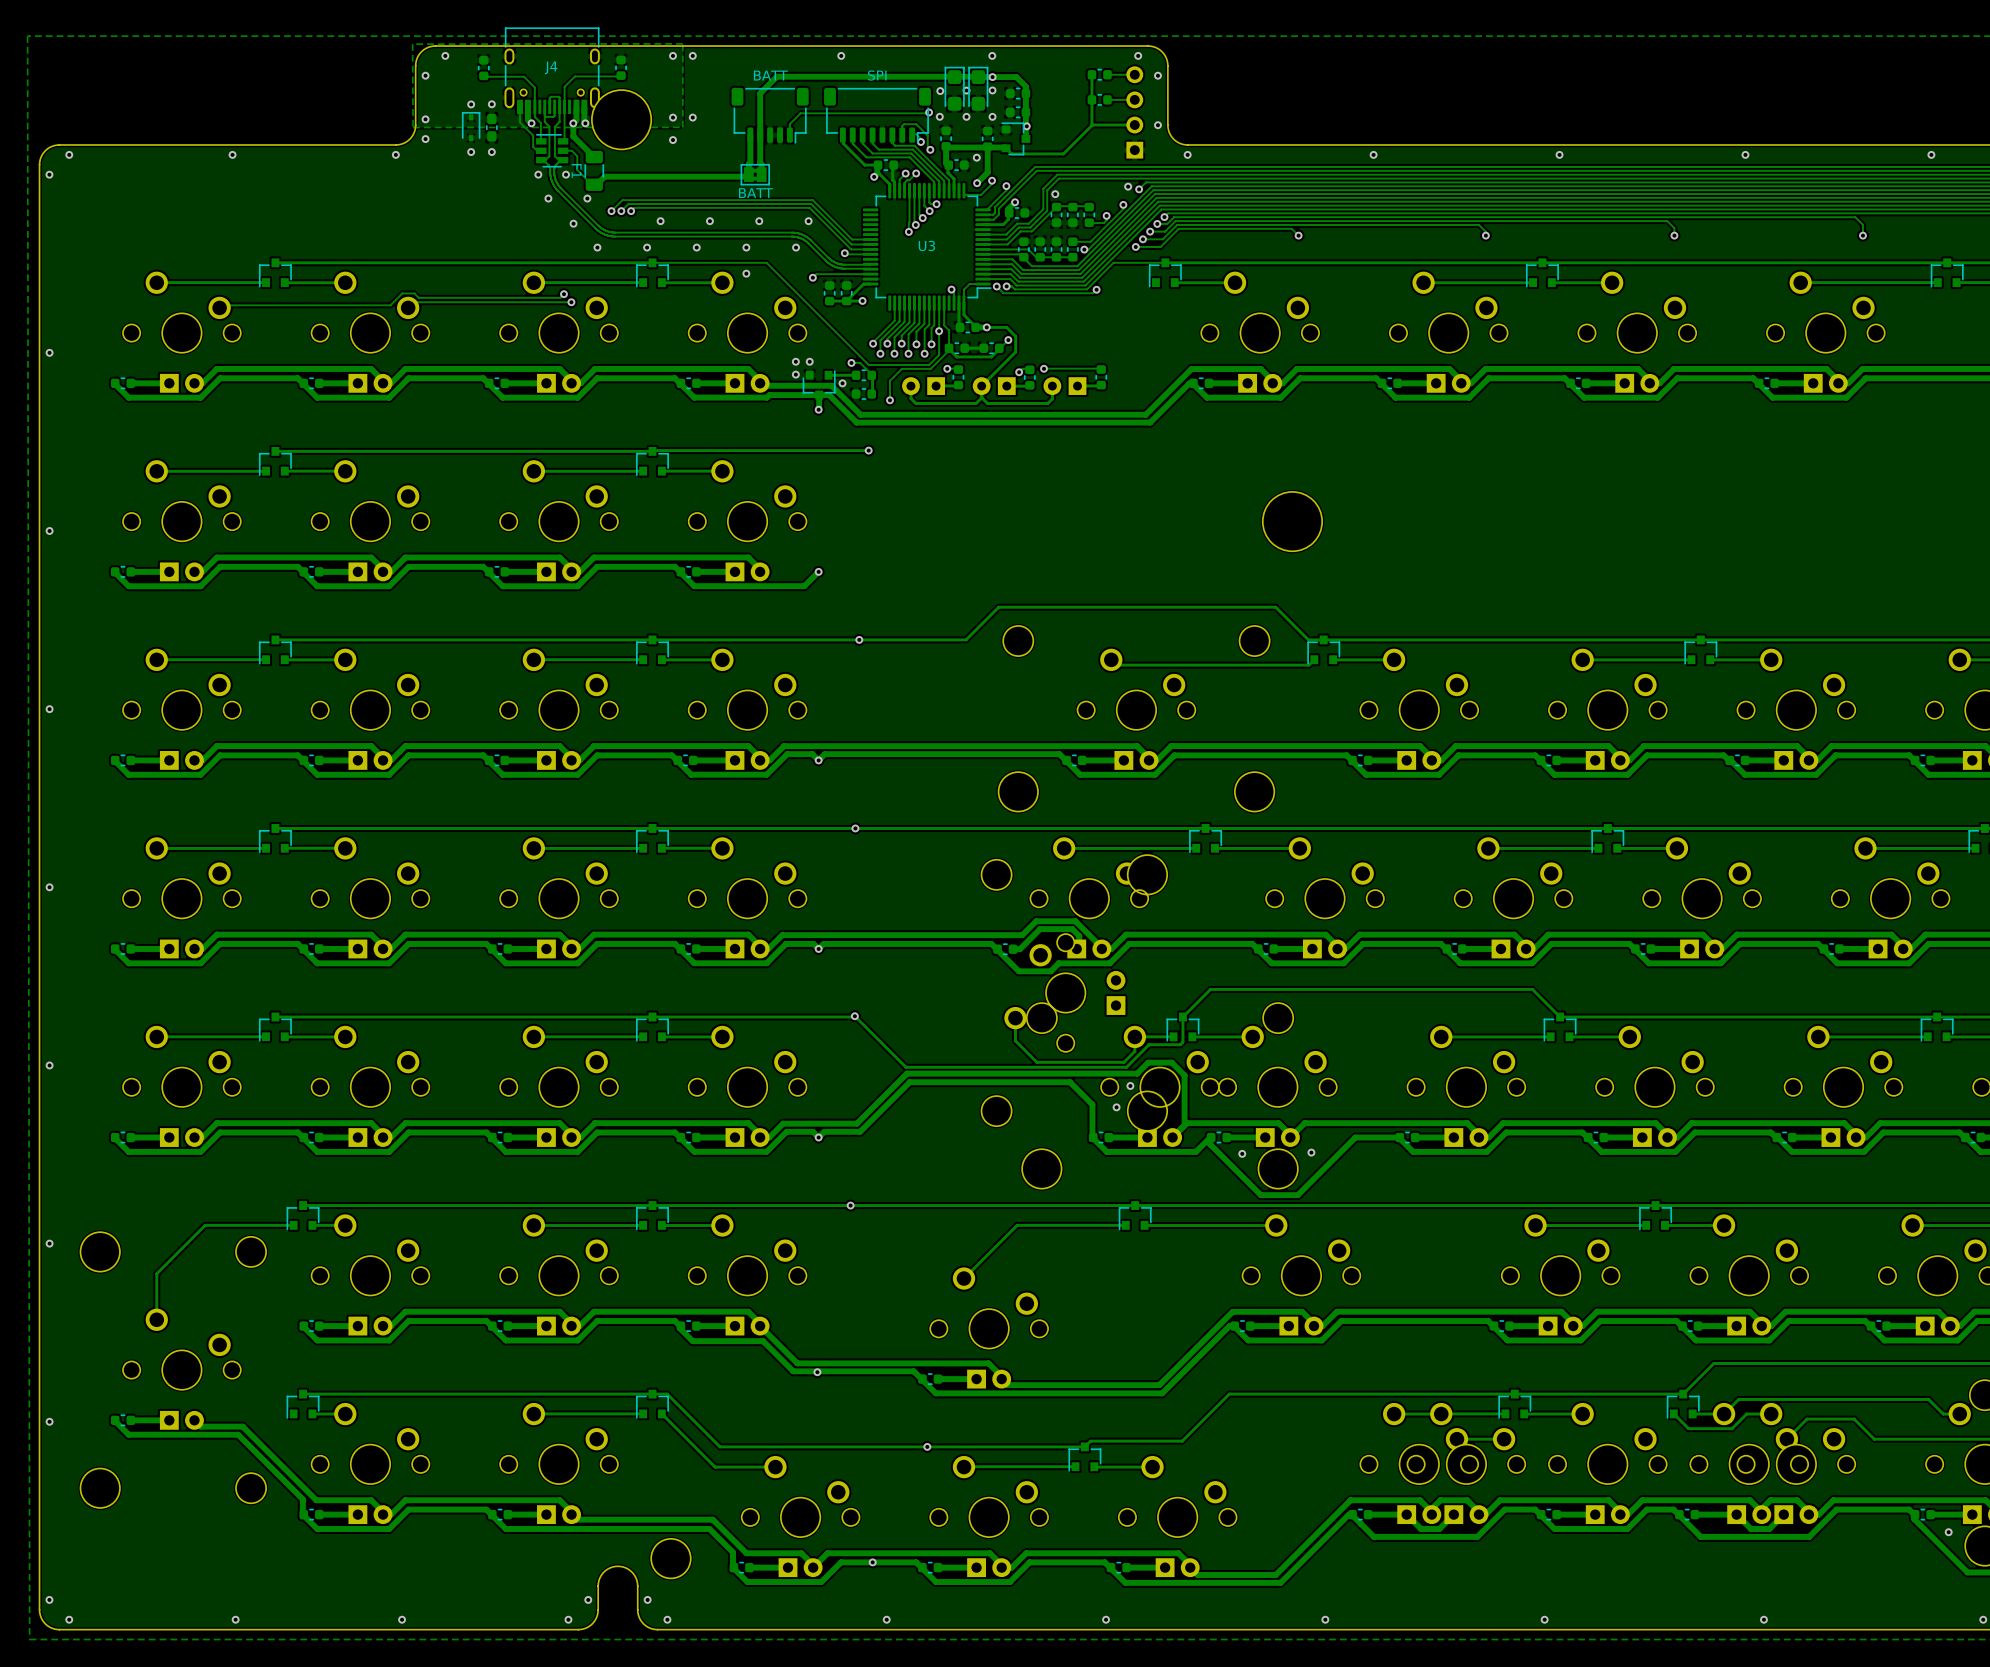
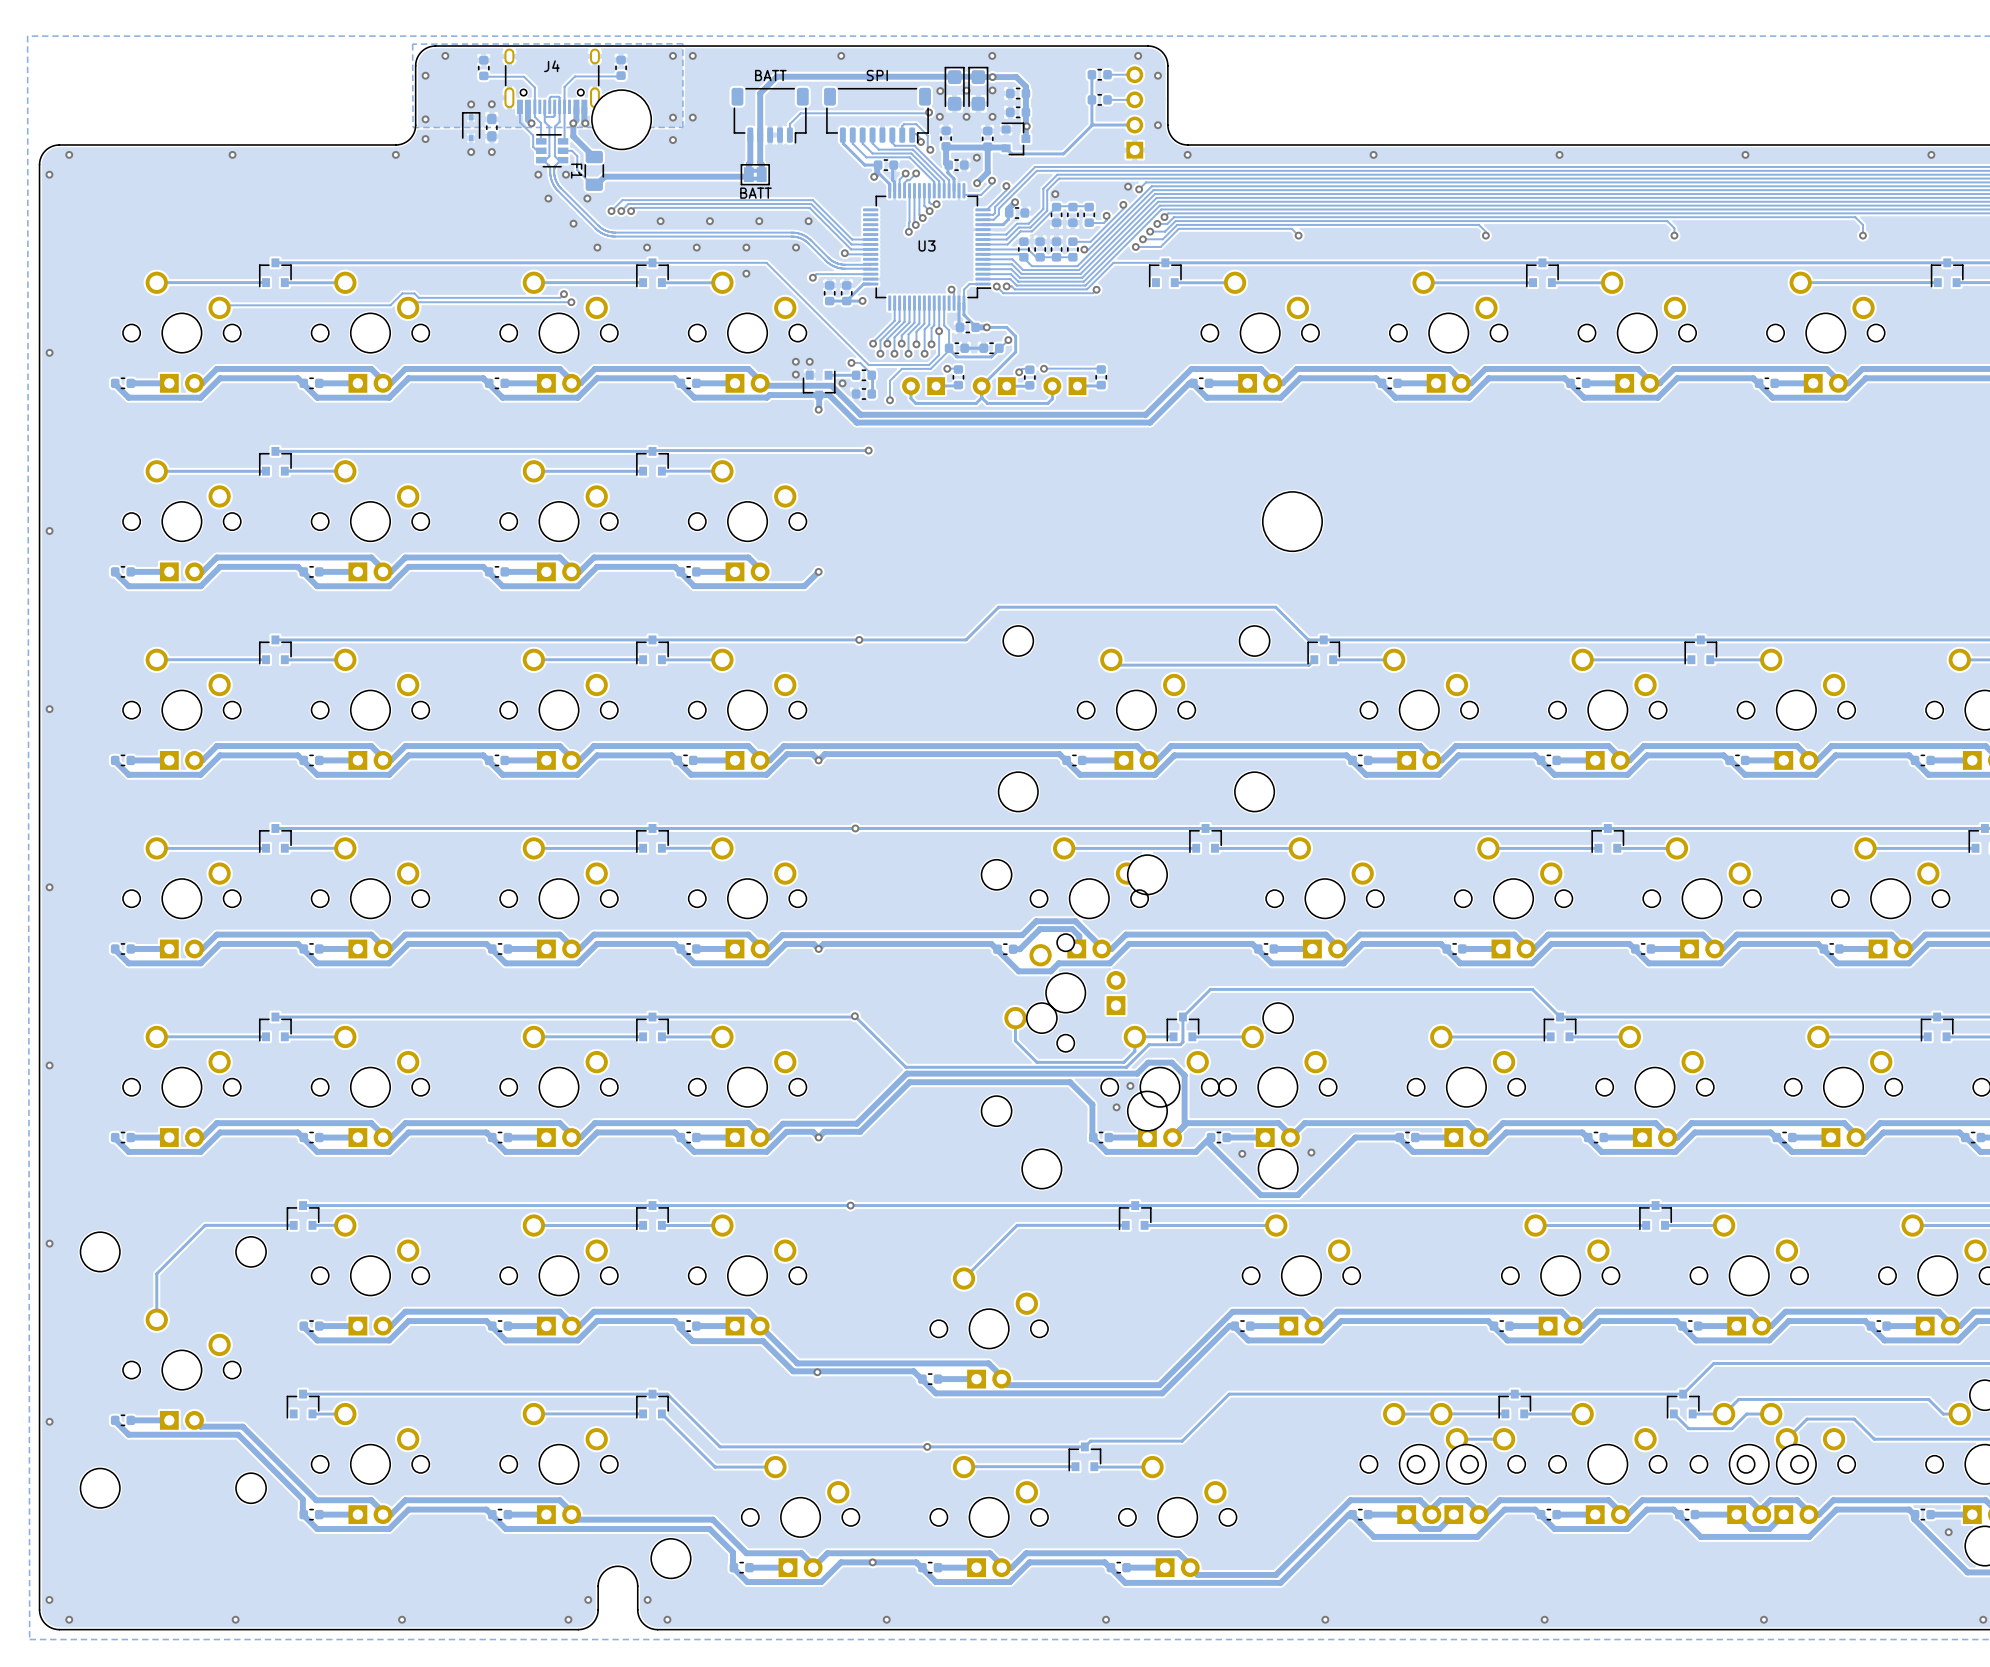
J4 footprint: [504, 27, 600, 115] -> [504, 48, 600, 115]

